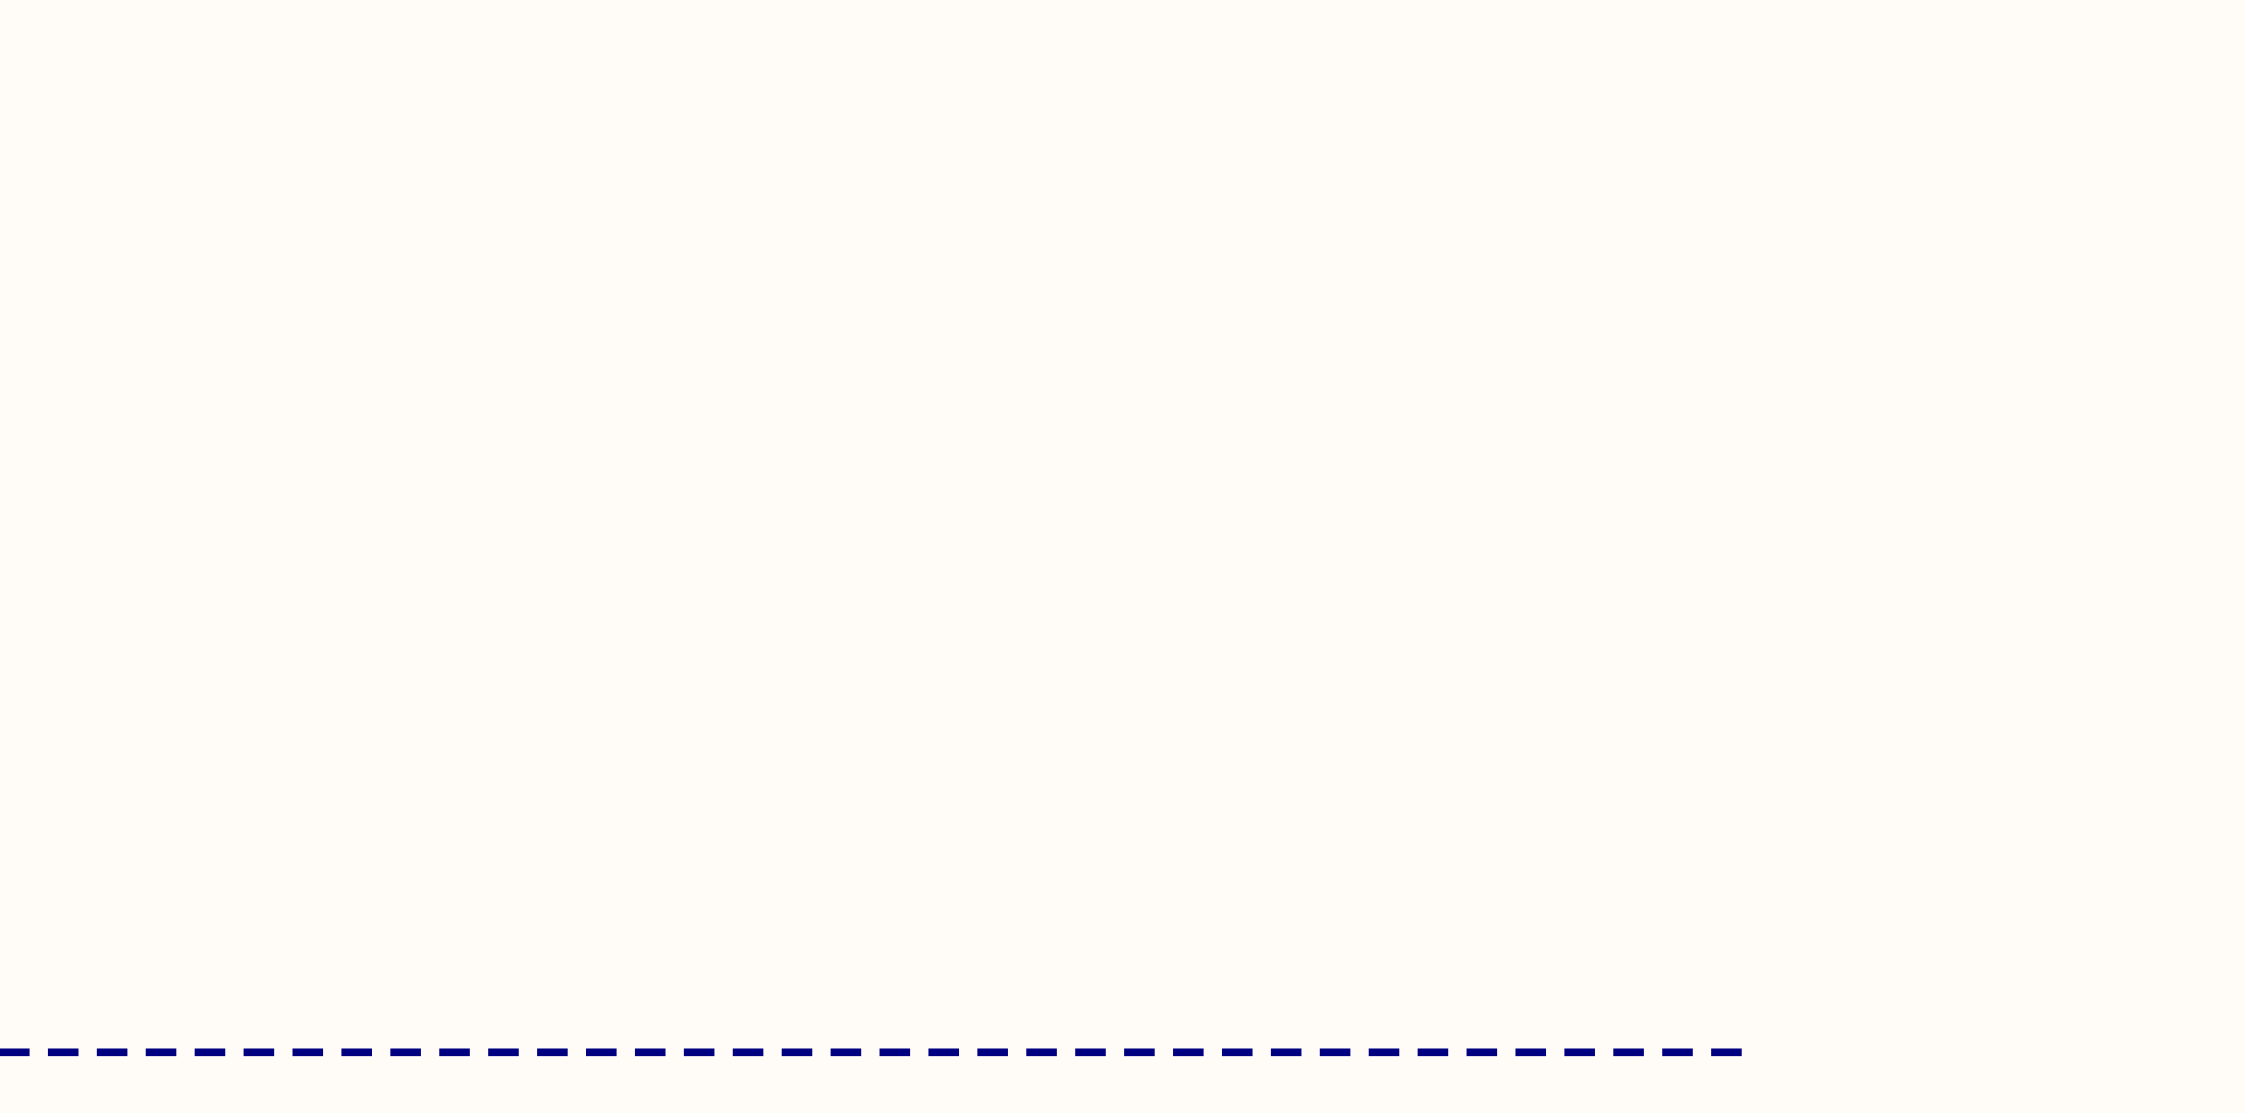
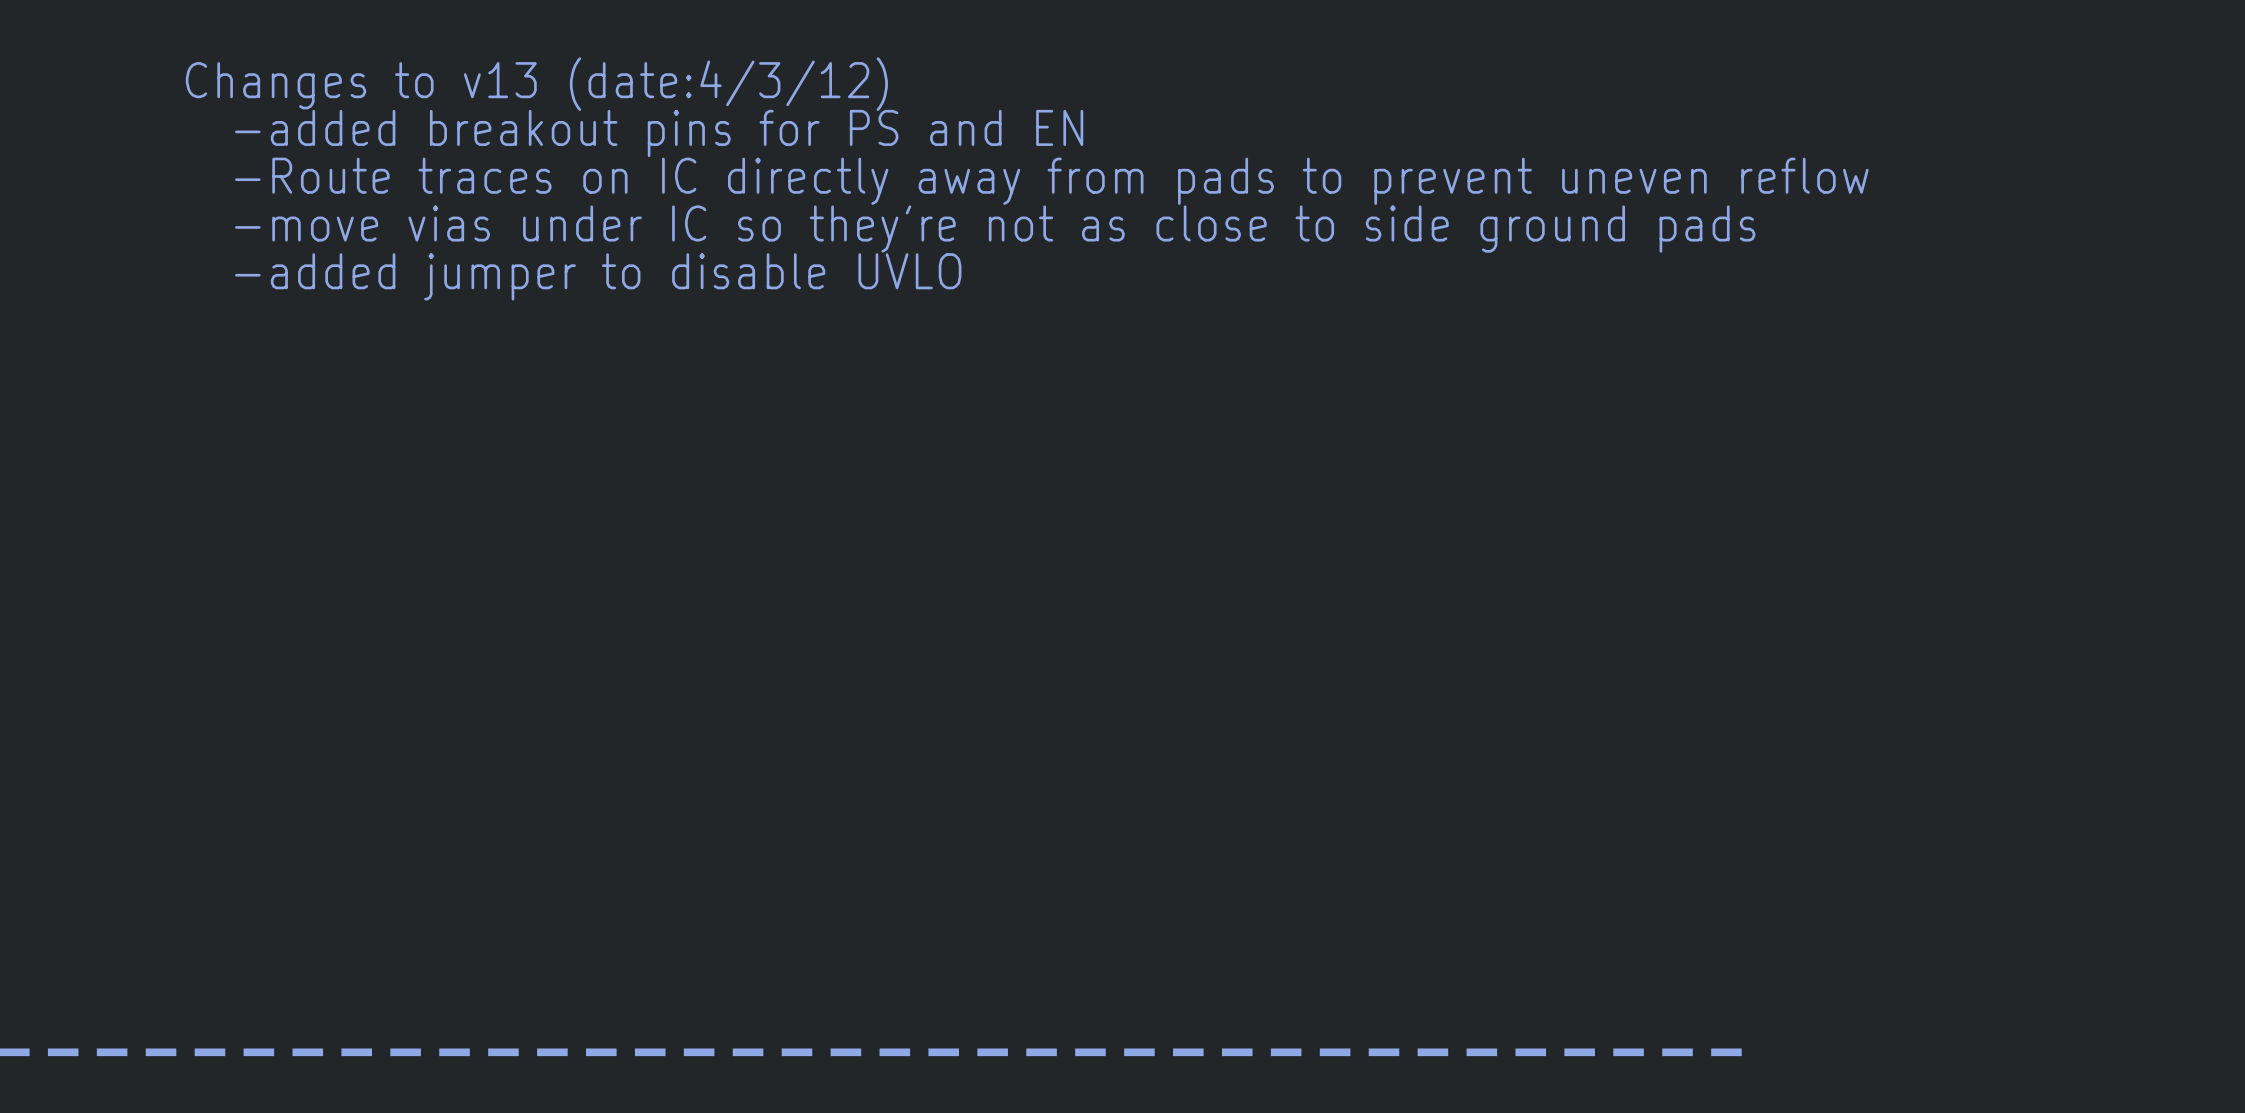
text: none -> Changes to v13 (date:4/3/12) (536, 84)
text: none -> -added breakout pins for PS and EN (659, 133)
text: none -> -Route traces on IC directly away from pads to prevent uneven reflow (1051, 181)
text: none -> -move vias under IC so they're not as close to side ground pads (995, 229)
text: none -> -added jumper to disable UVLO (598, 276)

